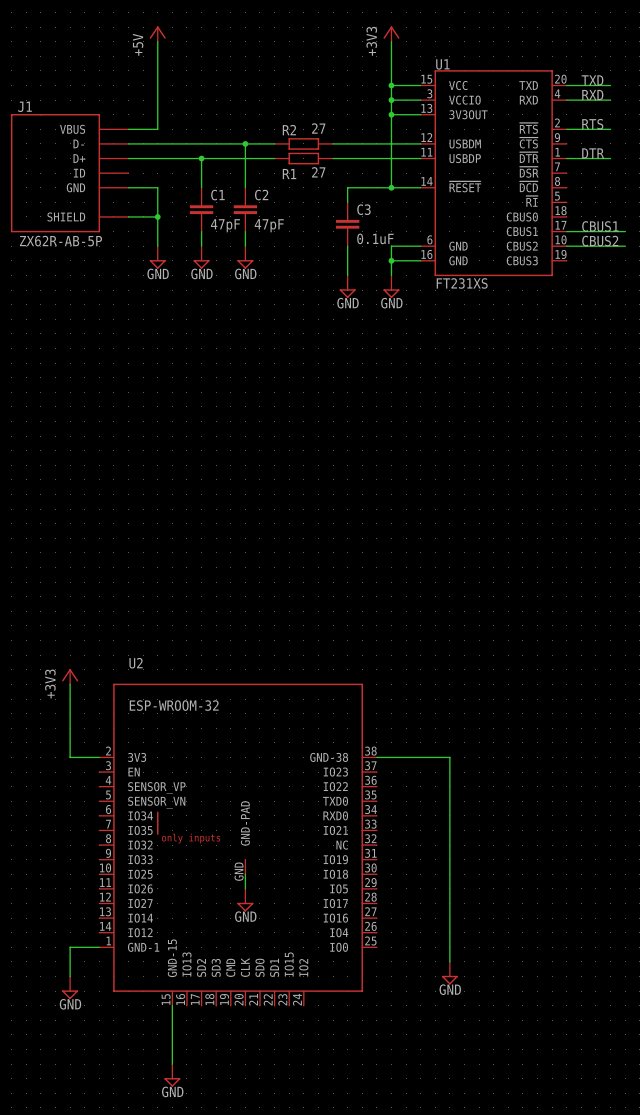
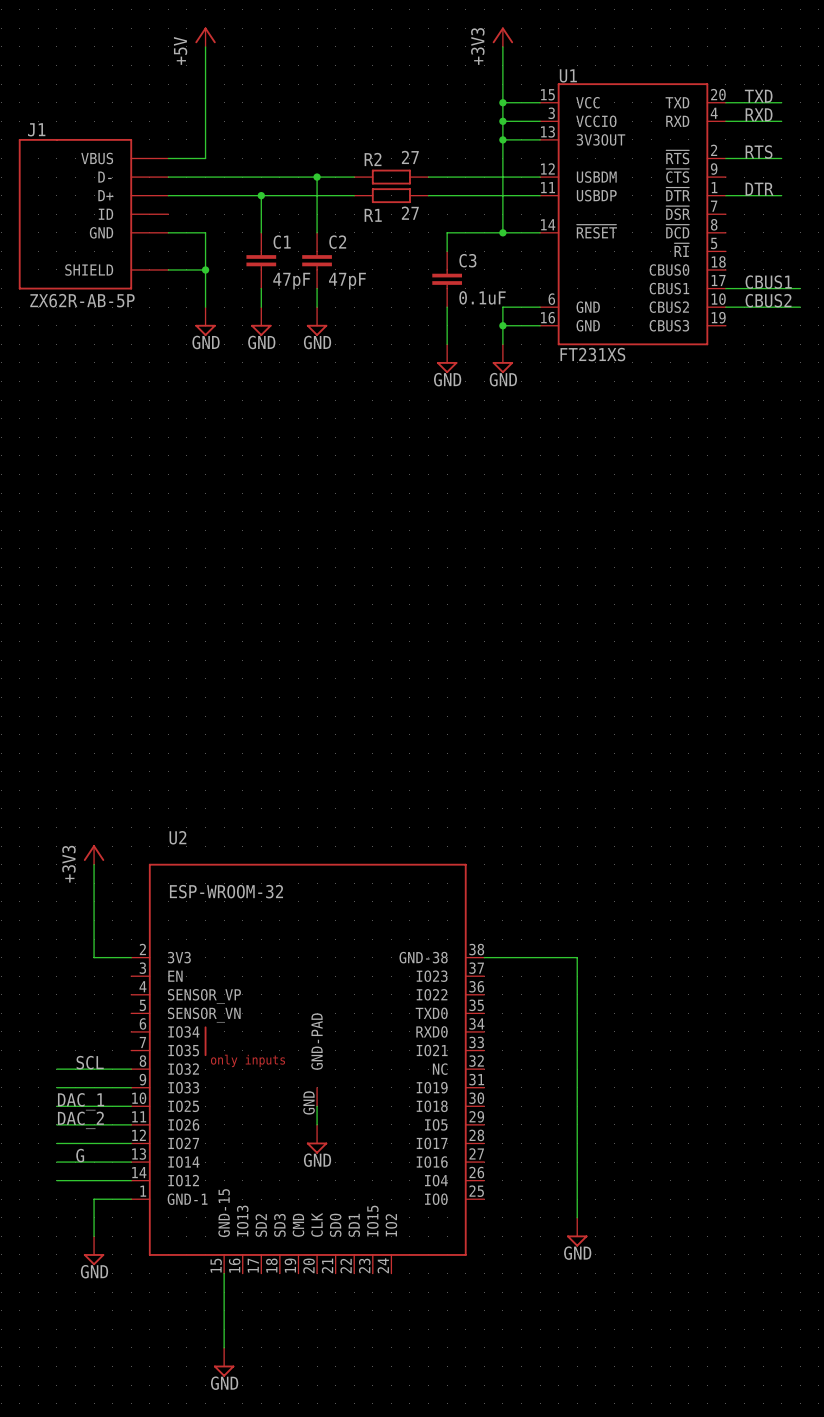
label: none -> SCL (90, 1062)
wire: none -> (56, 1069) (131, 1069)
wire: none -> (56, 1087) (131, 1087)
label: none -> DAC_1 (81, 1101)
wire: none -> (56, 1106) (131, 1106)
label: none -> DAC_2 (80, 1120)
wire: none -> (56, 1124) (131, 1124)
wire: none -> (56, 1143) (131, 1143)
label: none -> G (80, 1155)
wire: none -> (56, 1162) (131, 1162)
wire: none -> (56, 1180) (131, 1180)

